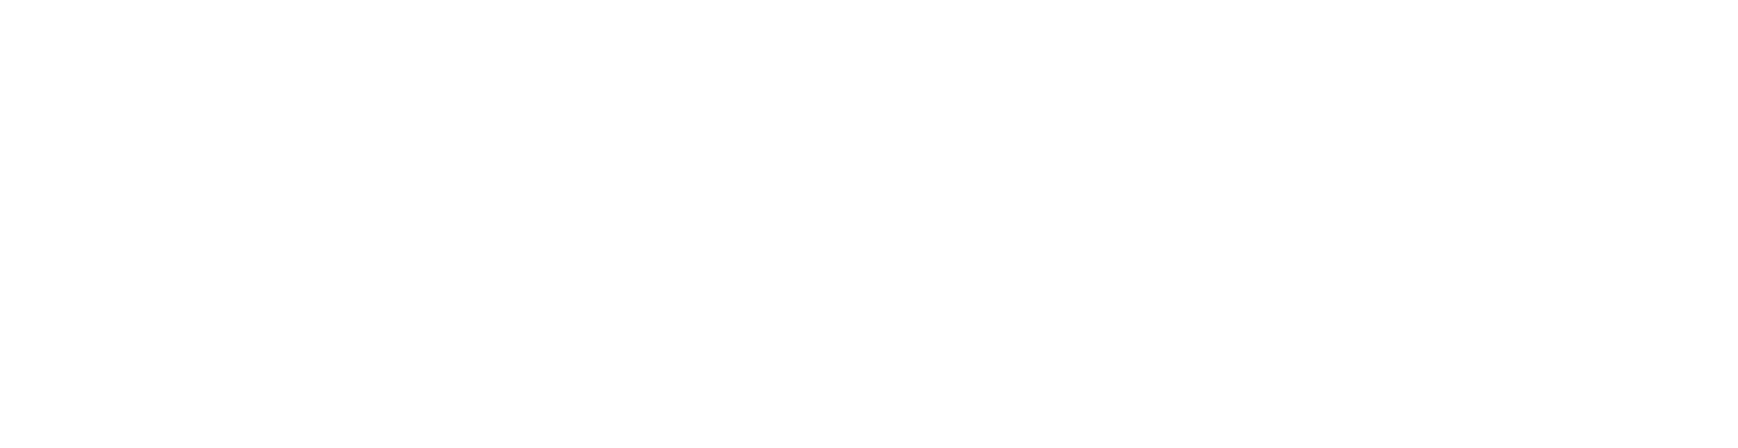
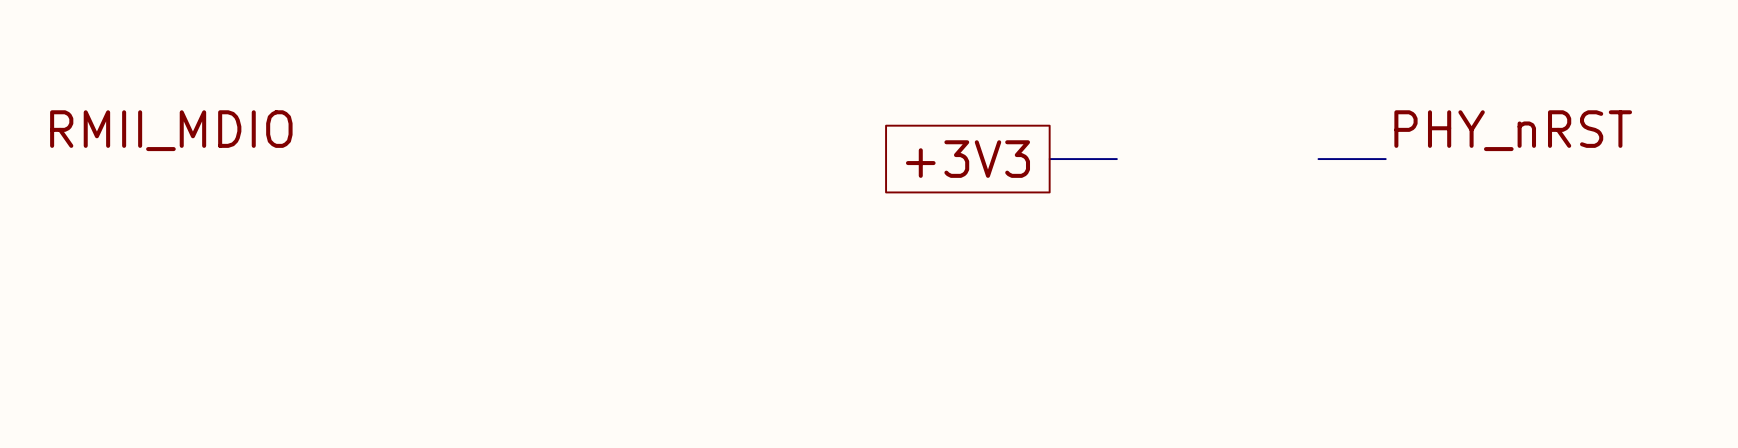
label: none -> RMII_MDIO (171, 130)
label: none -> PHY_nRST (1513, 130)
global label: none -> +3V3 (967, 159)
wire: none -> (1049, 159) (1116, 159)
wire: none -> (1318, 159) (1385, 159)

